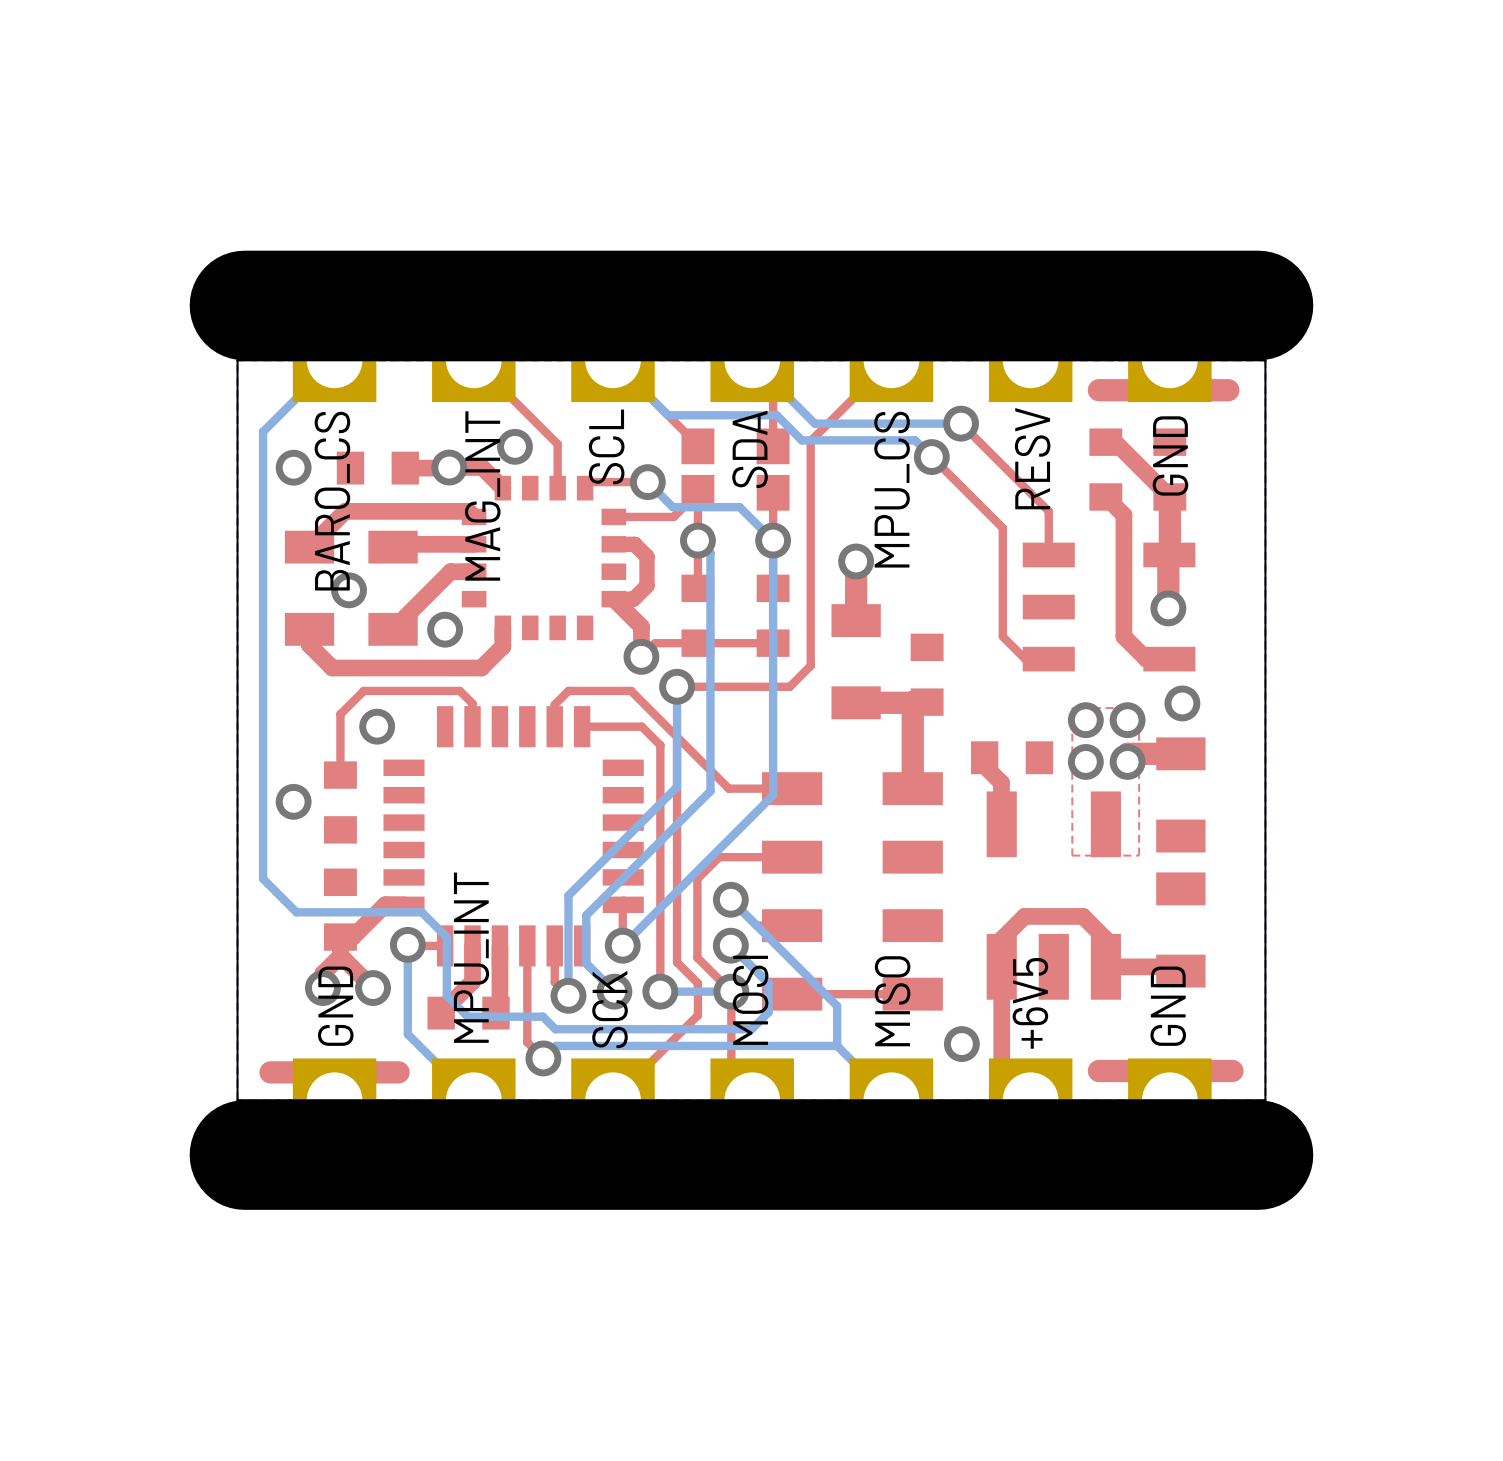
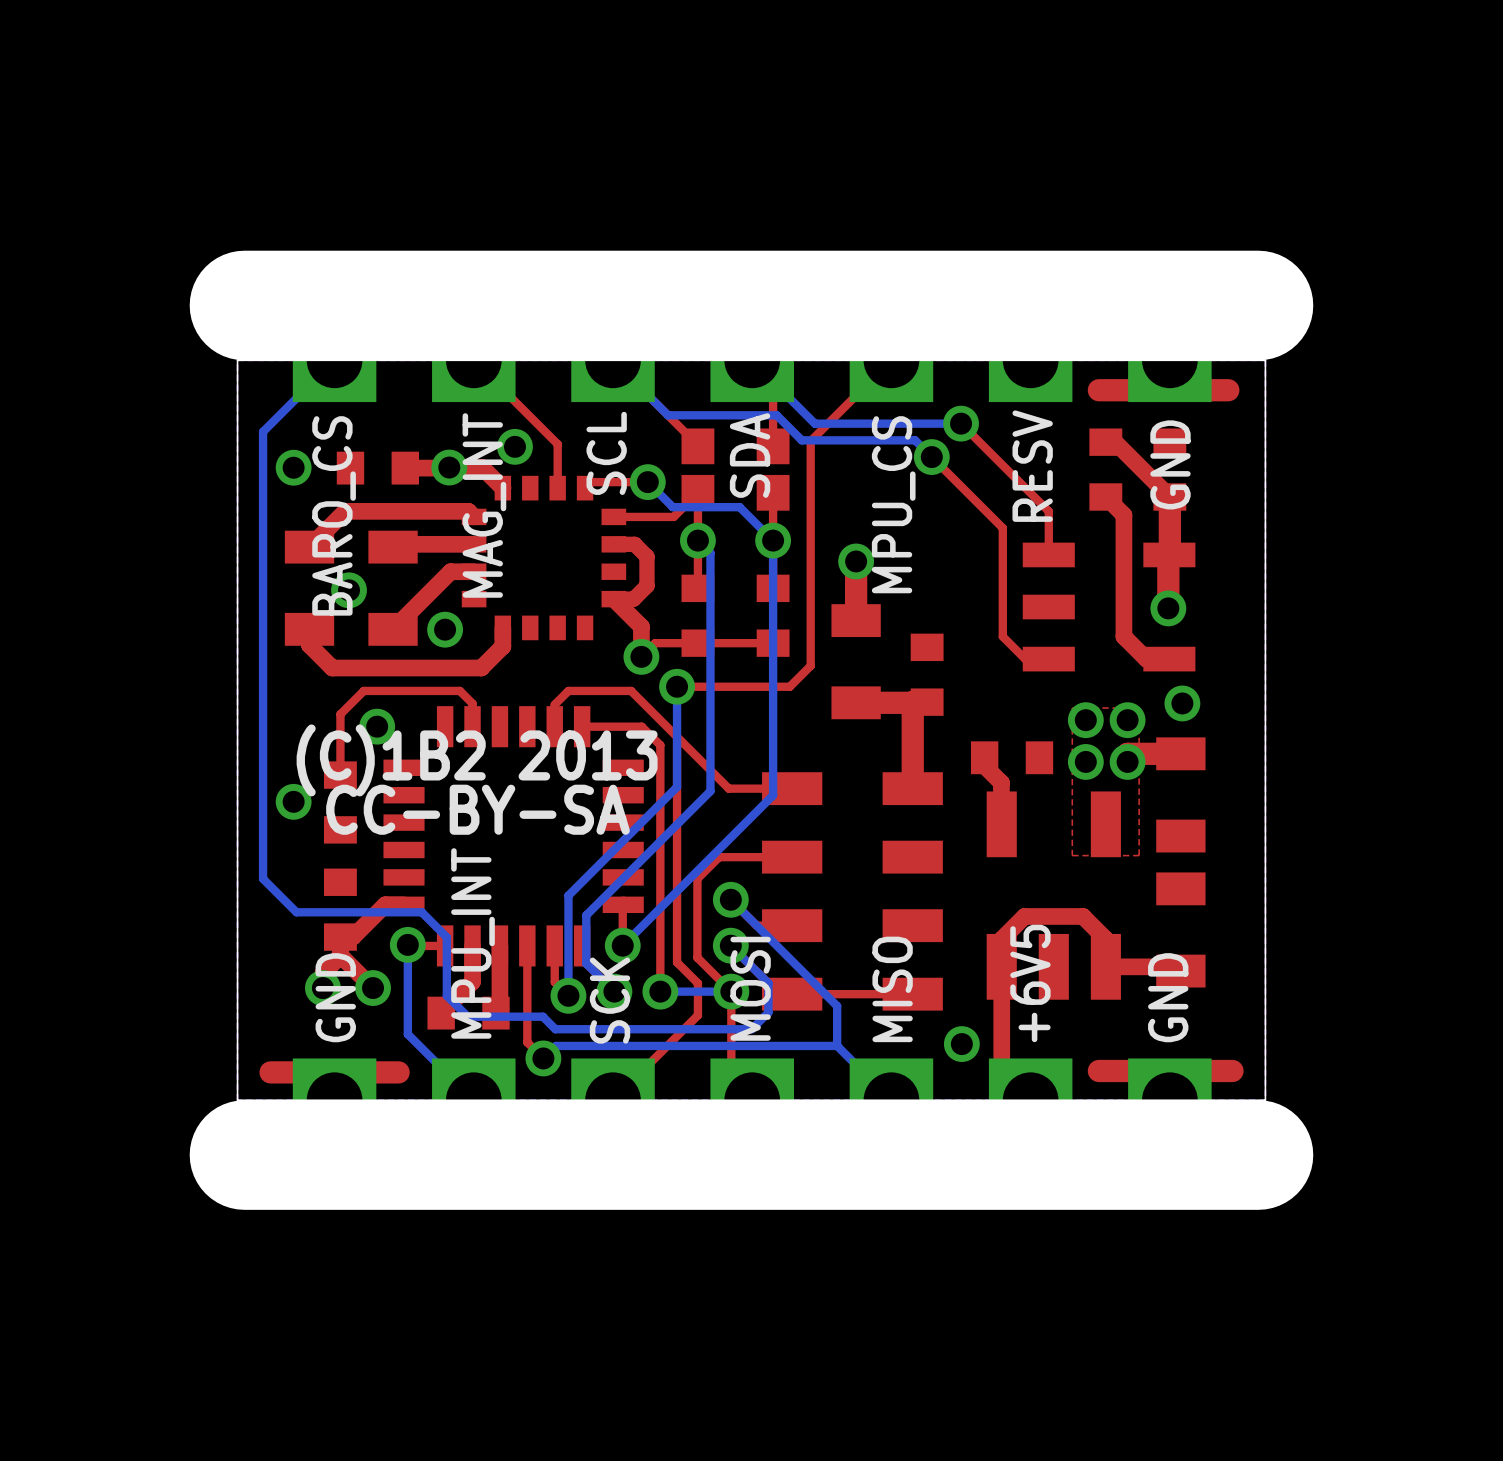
text: none -> (C)1B2 2013 (477, 760)
text: none -> CC-BY-SA (477, 809)

